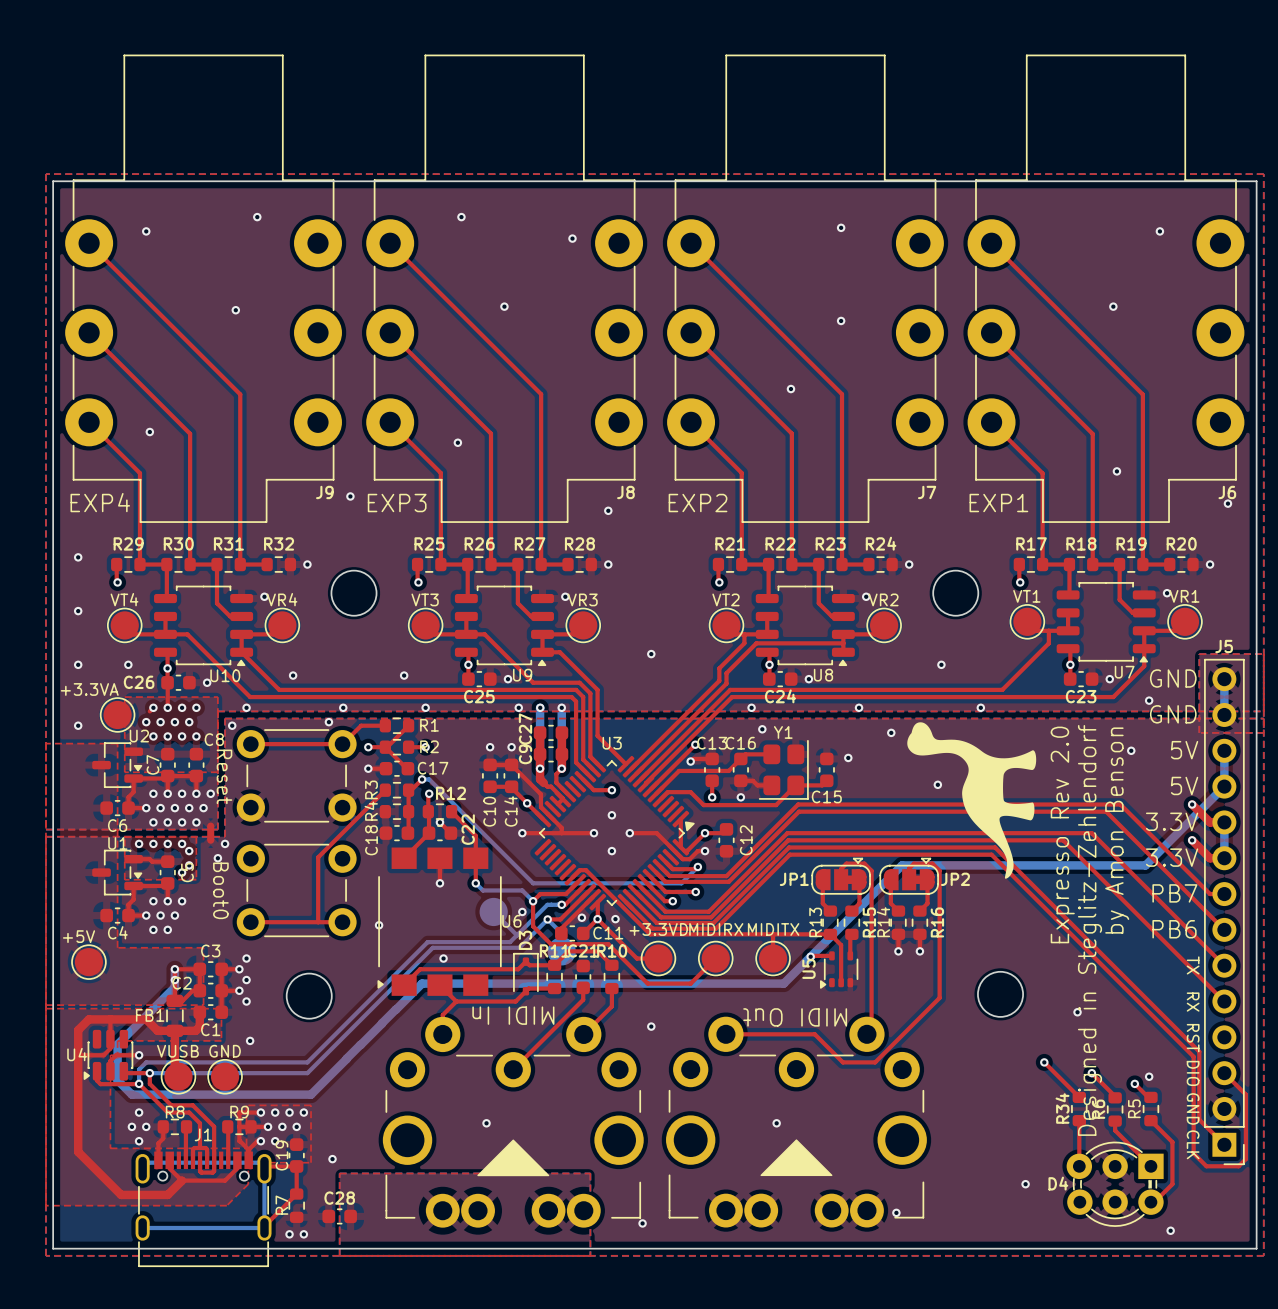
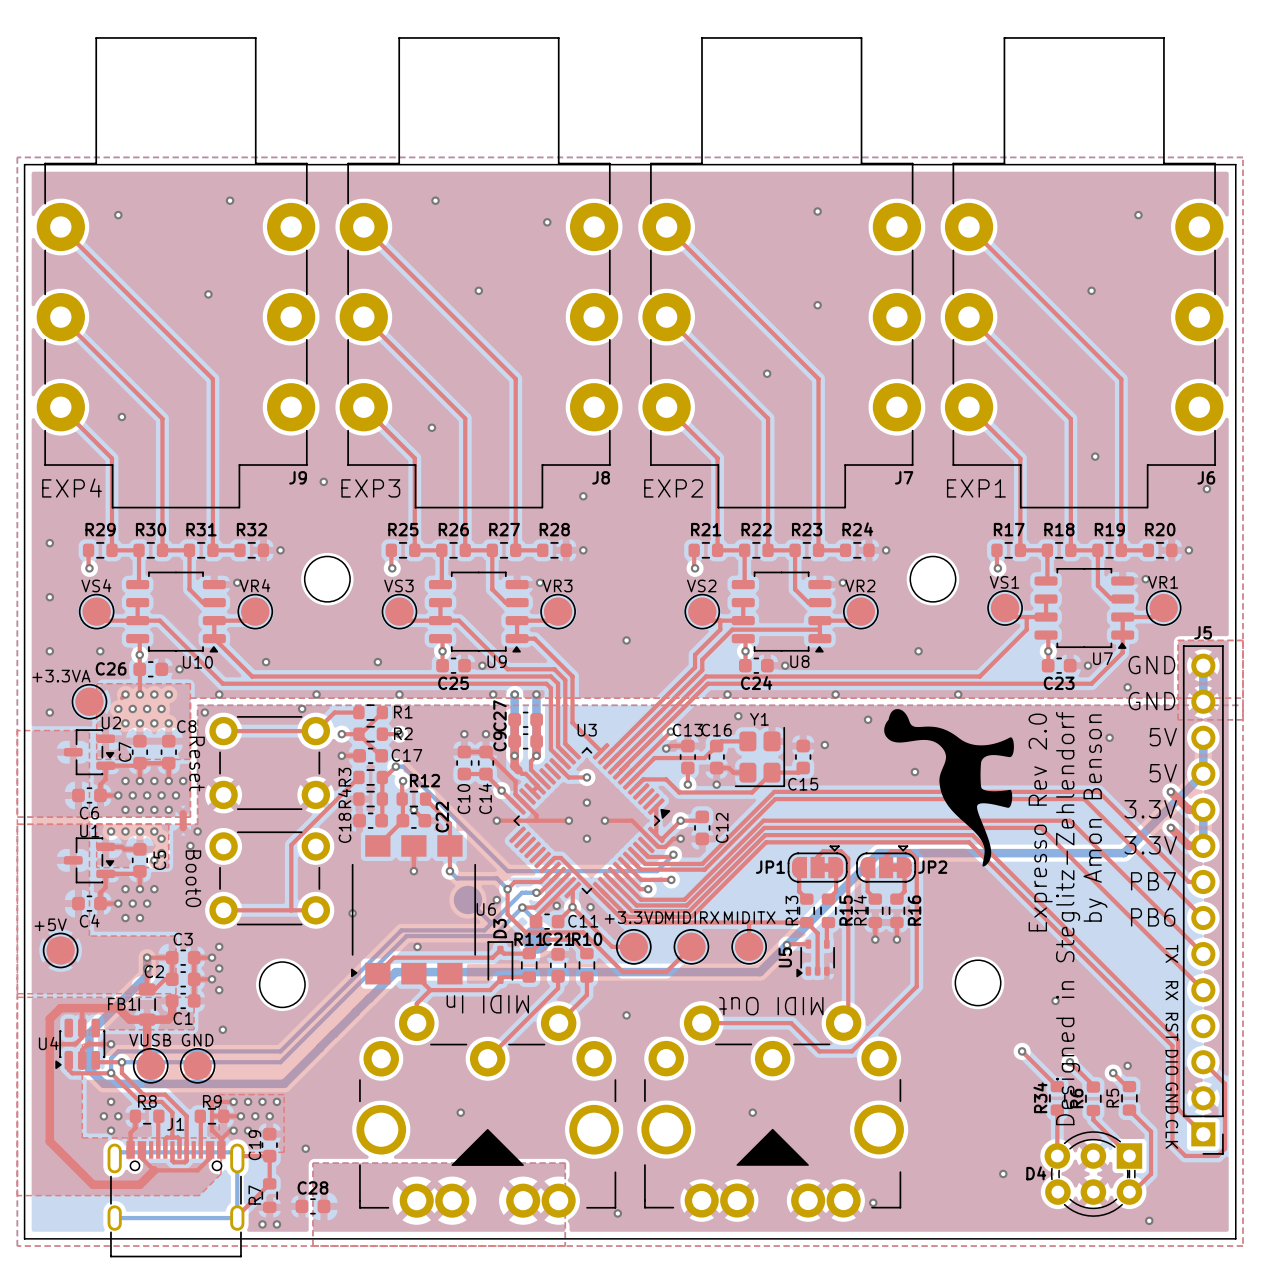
text: VT1 (1026, 596) -> VS1 (1004, 582)
text: VT4 (124, 599) -> VS4 (96, 585)
text: VT3 (425, 599) -> VS3 (398, 585)
text: VT2 (725, 599) -> VS2 (701, 585)

